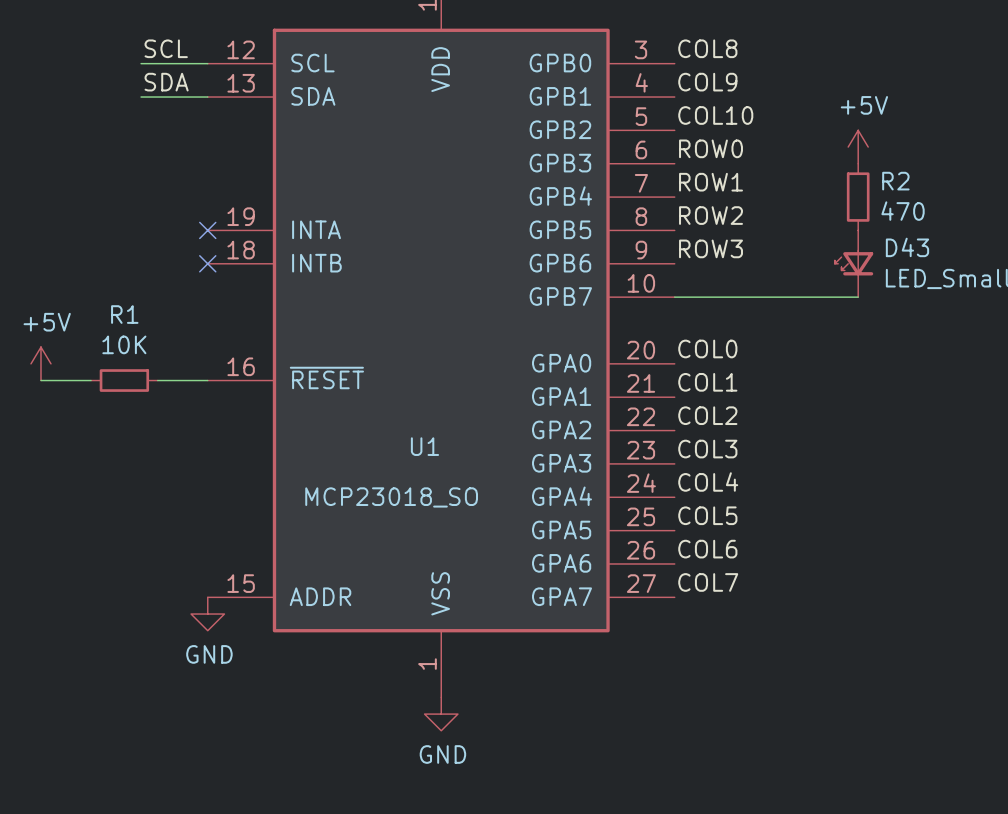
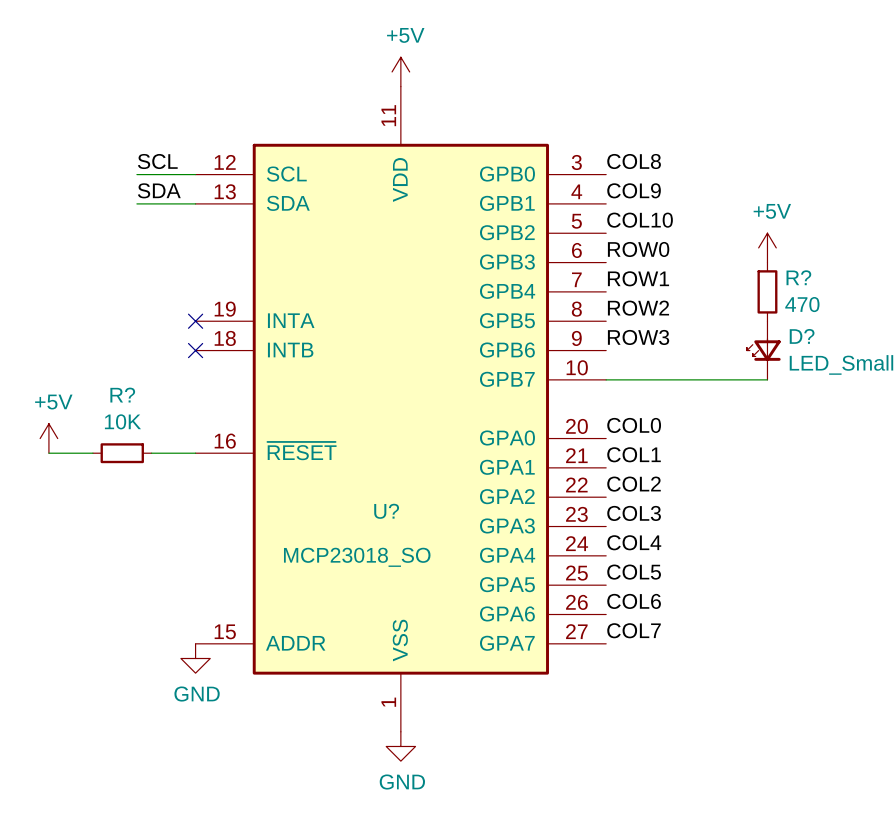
R2 name: R2 (895, 181) -> R? (798, 277)
D43 name: D43 (907, 247) -> D? (802, 336)
R1 name: R1 (124, 314) -> R? (122, 395)
U1 name: U1 (424, 446) -> U? (386, 511)

